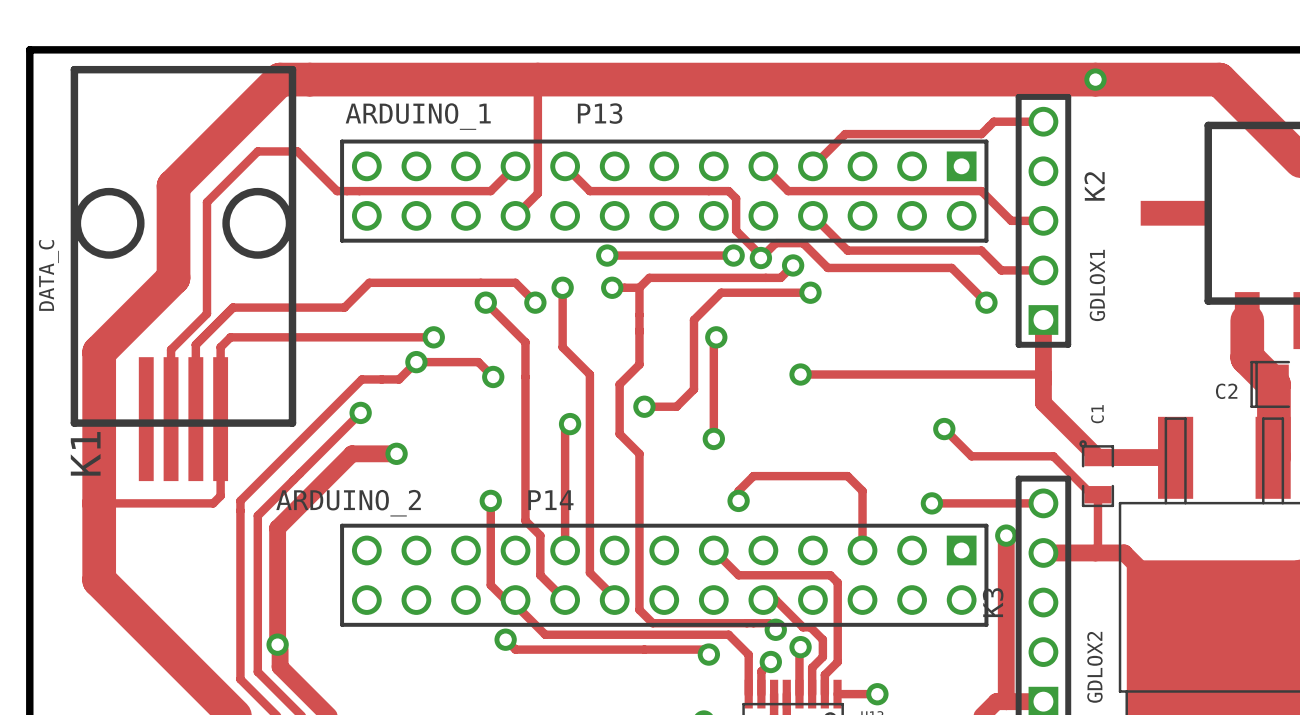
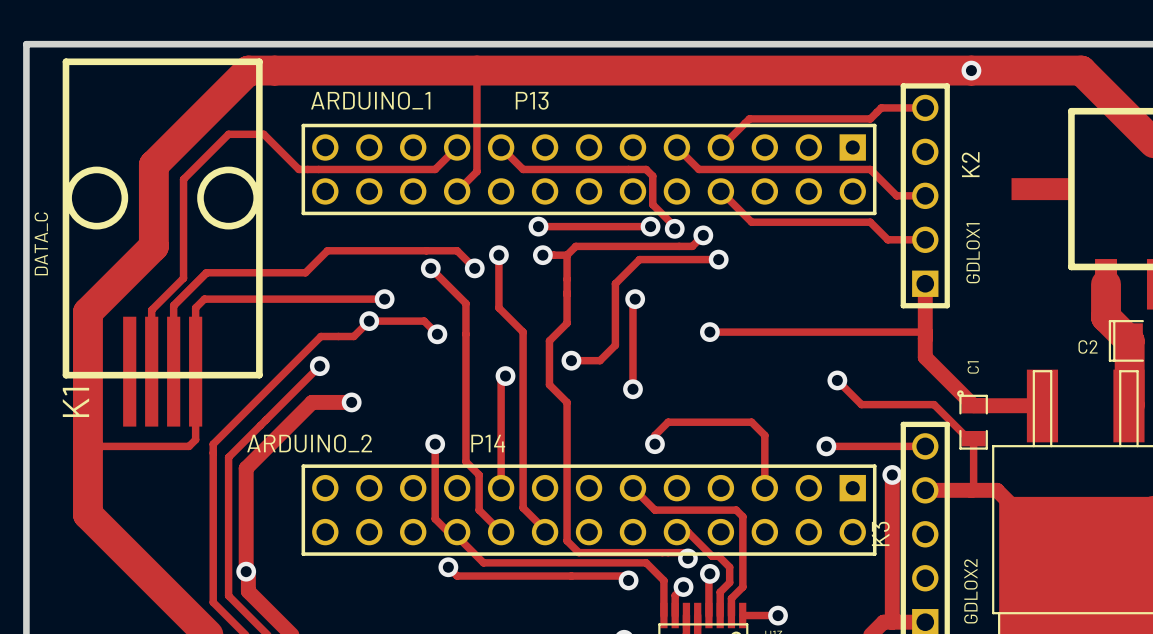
track: (760, 258) (775, 243) (803, 243) (827, 267) (951, 267) (986, 302) -> none
via: (986, 302) -> none

